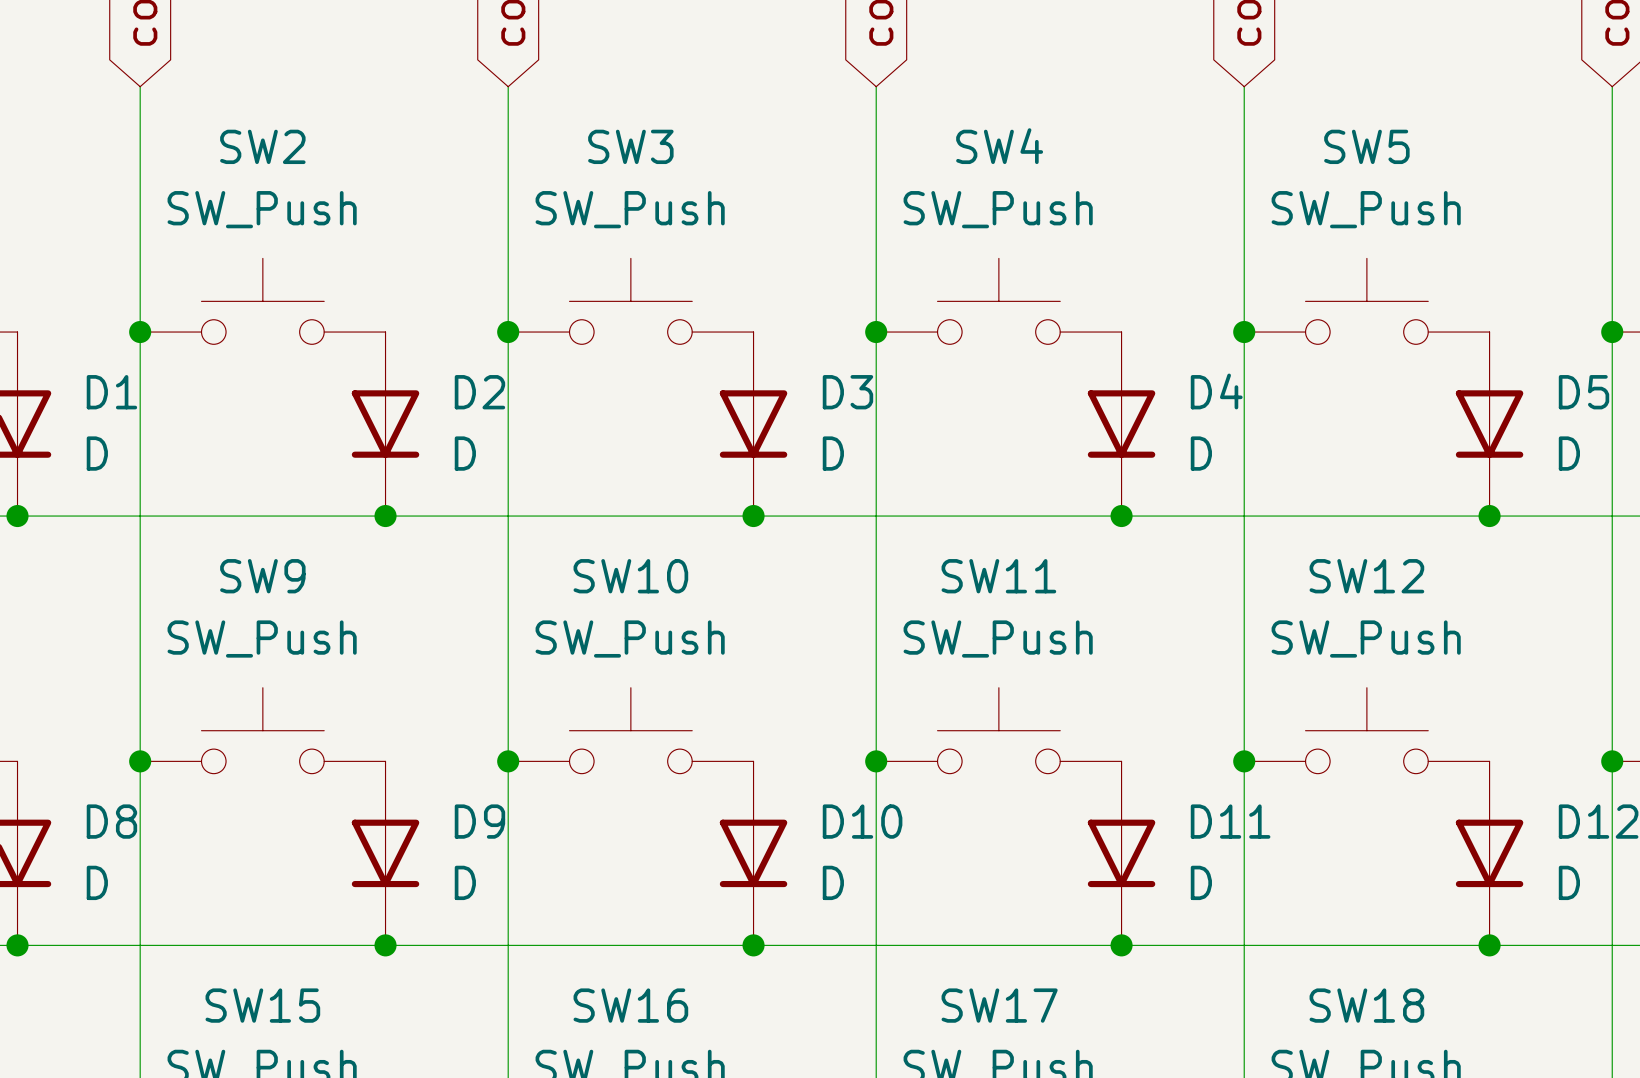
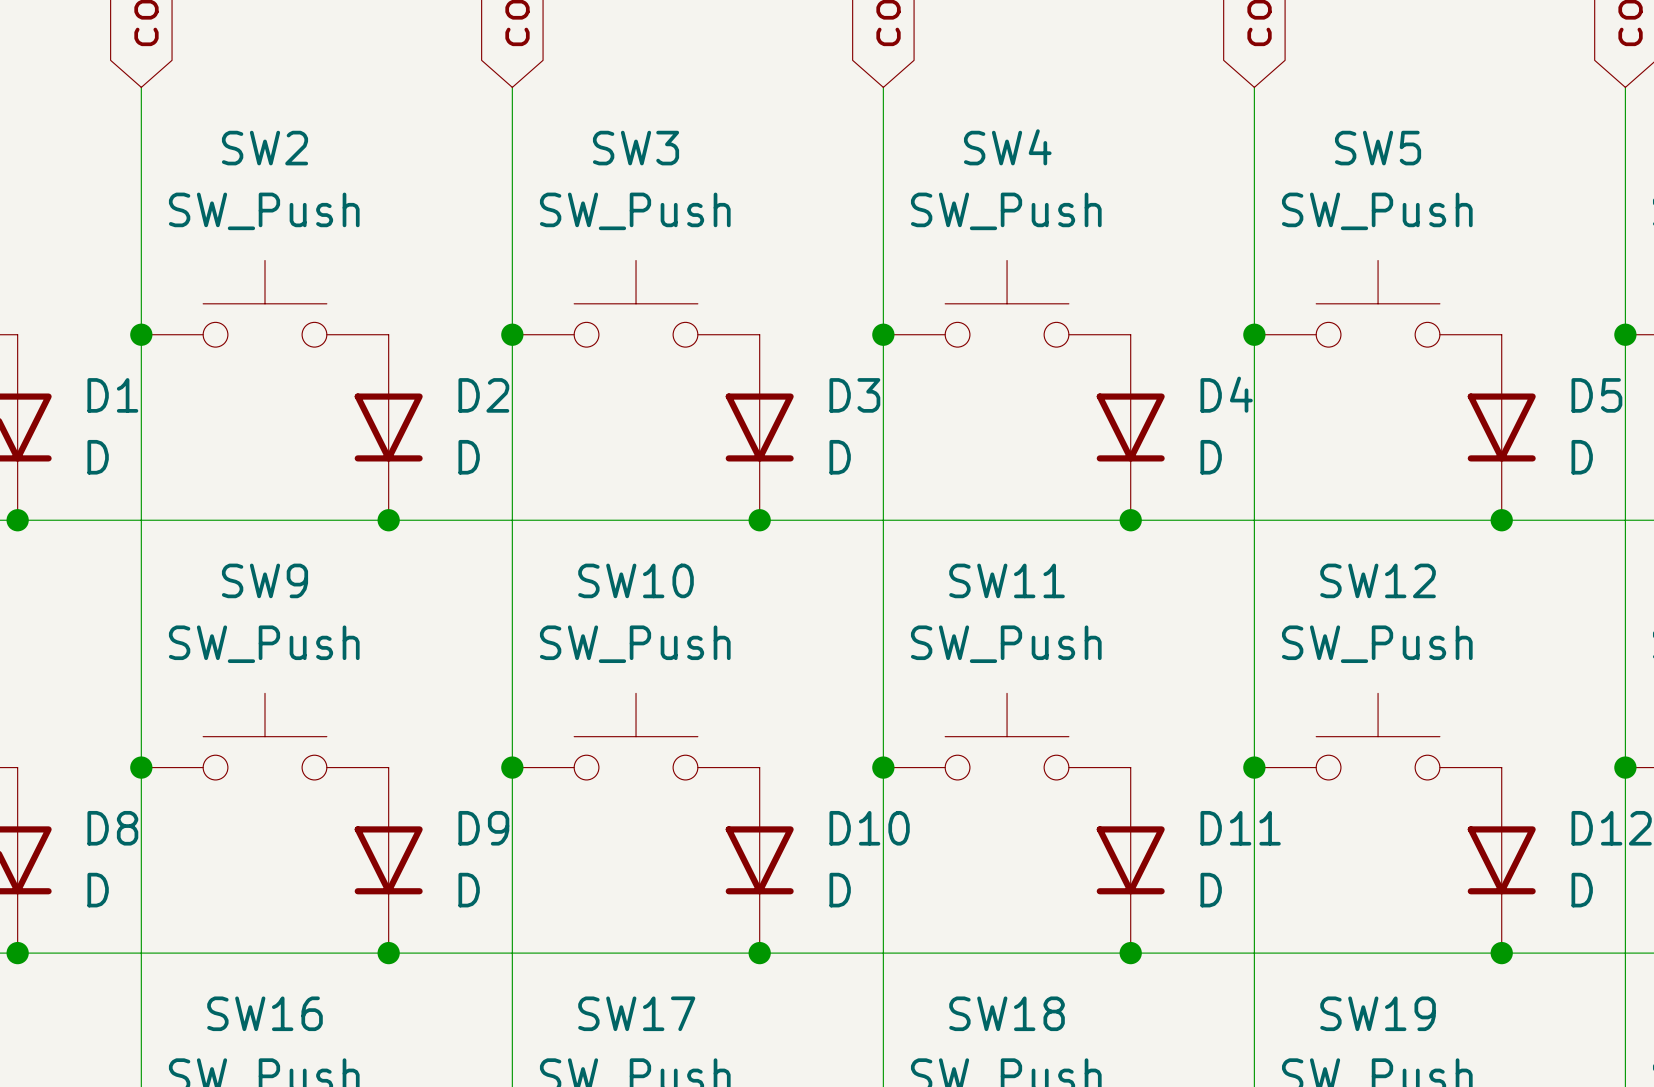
SW15 name: SW15 (262, 1005) -> SW16 (264, 1013)
SW16 name: SW16 (630, 1005) -> SW17 (636, 1013)
SW17 name: SW17 (999, 1005) -> SW18 (1007, 1013)
SW18 name: SW18 (1366, 1005) -> SW19 (1378, 1013)

